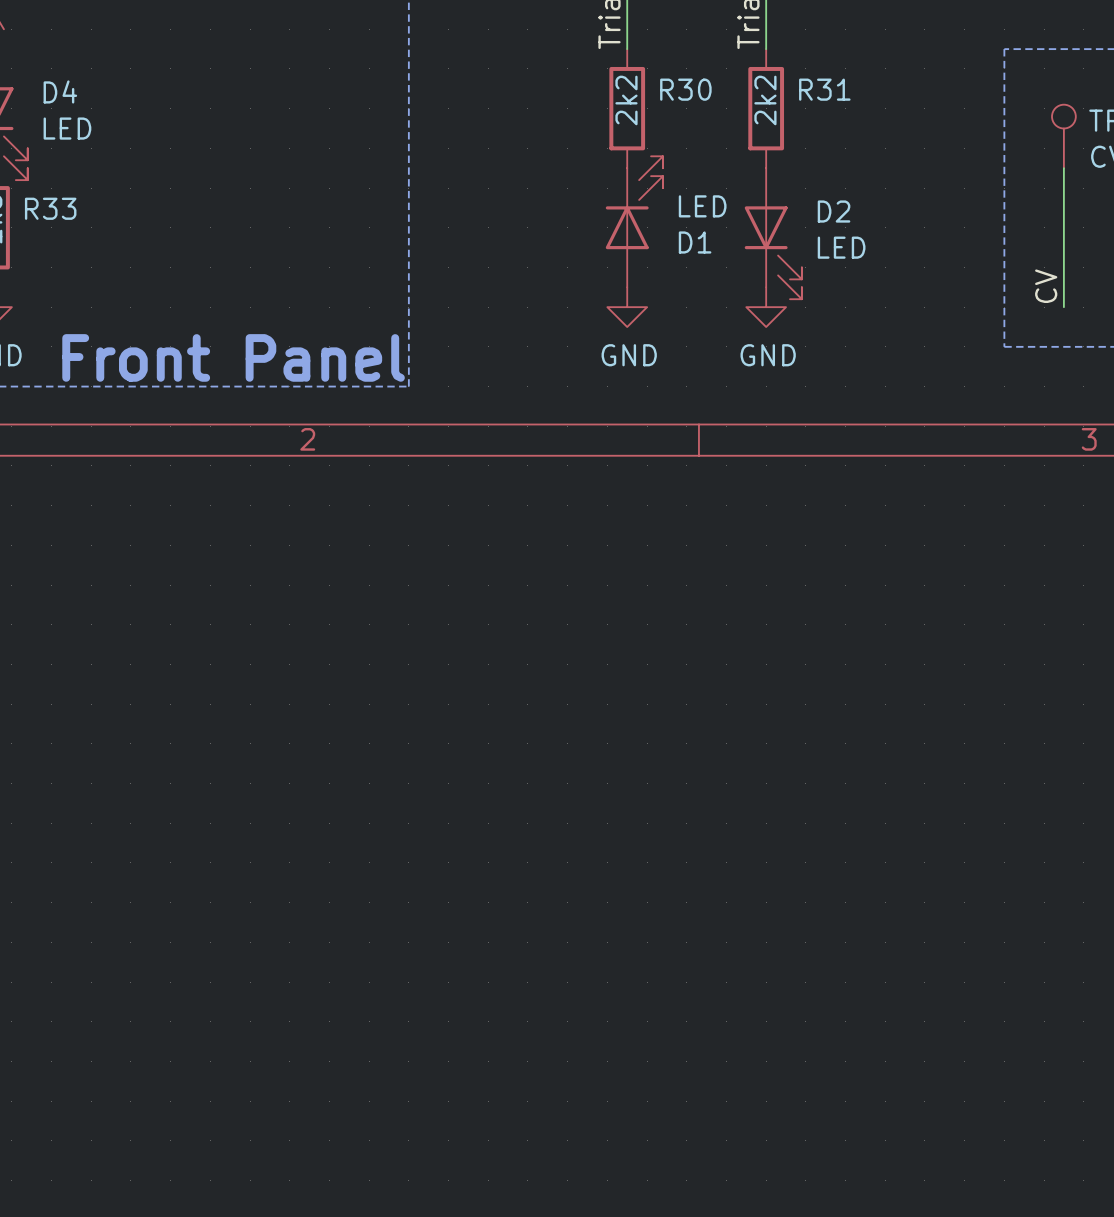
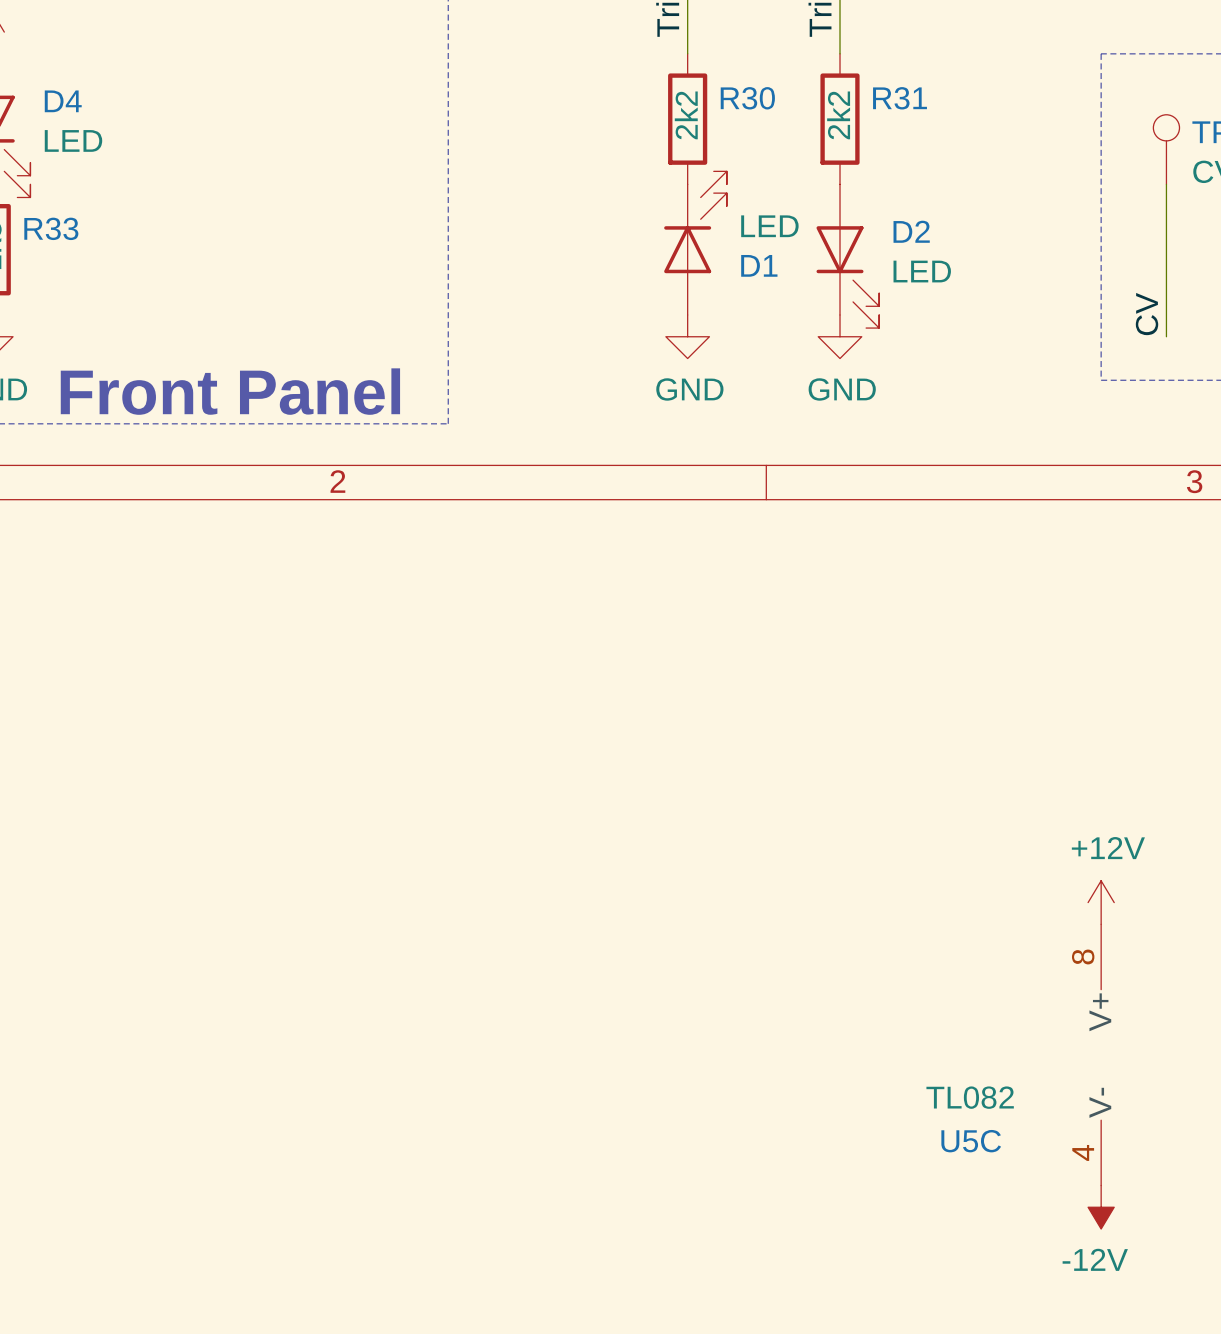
power symbol: none -> +12V (1101, 902)
U5C: none -> TL082 (1101, 1054)
power symbol: none -> -12V (1101, 1207)

